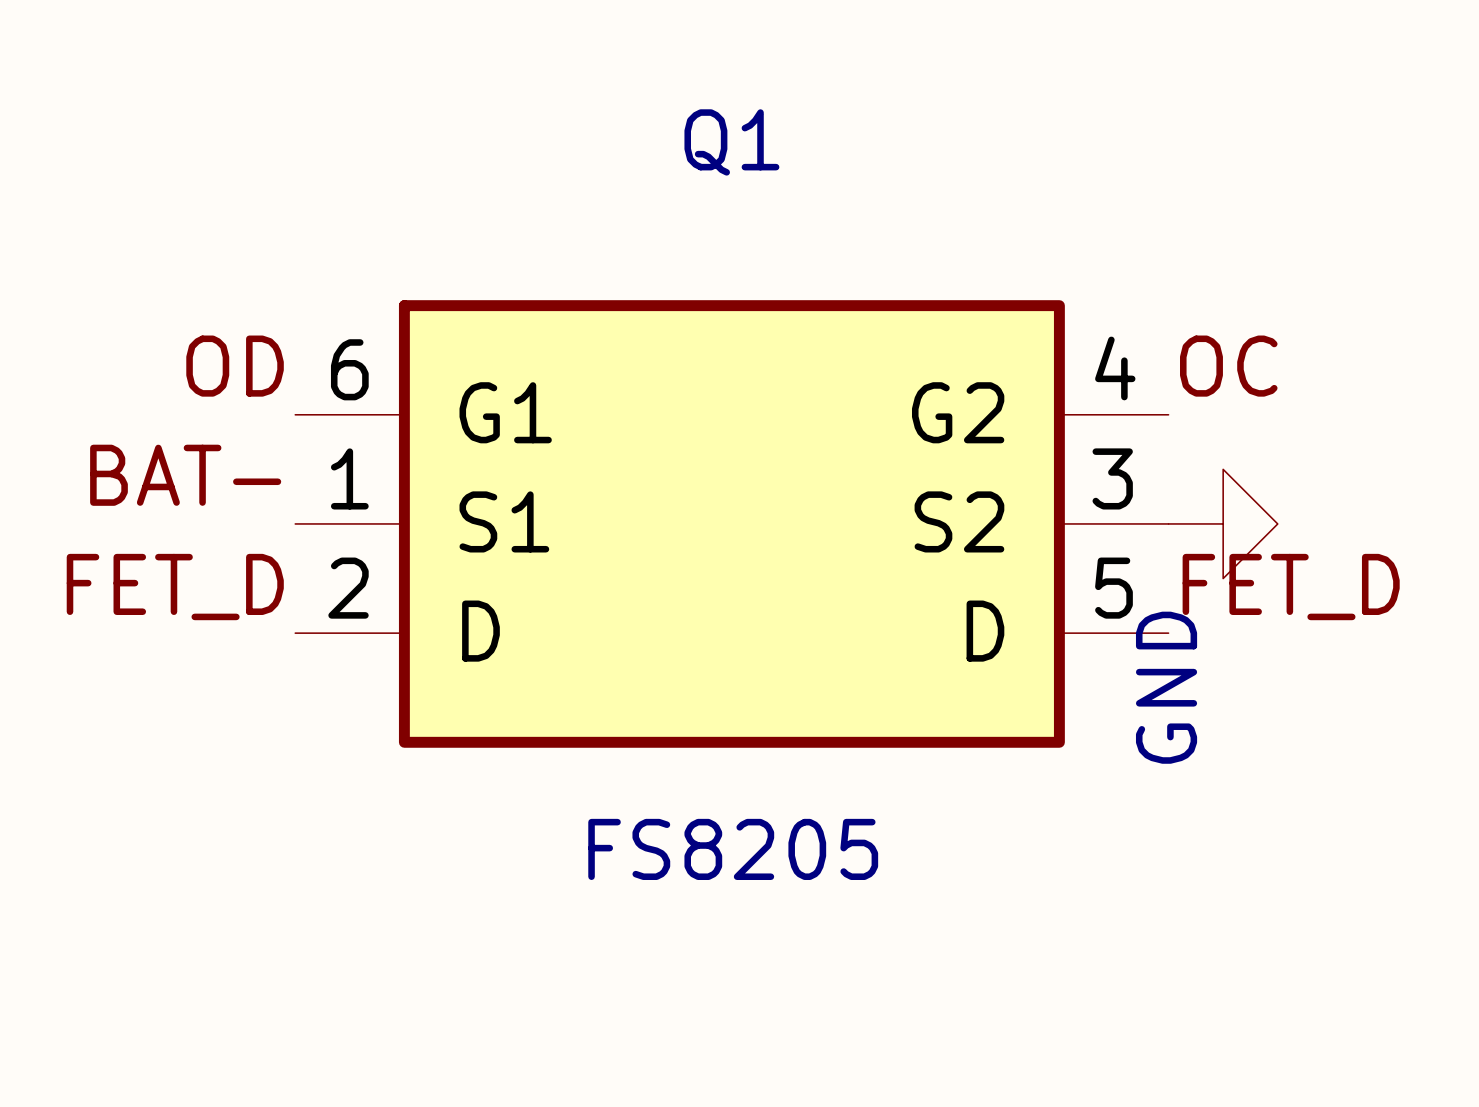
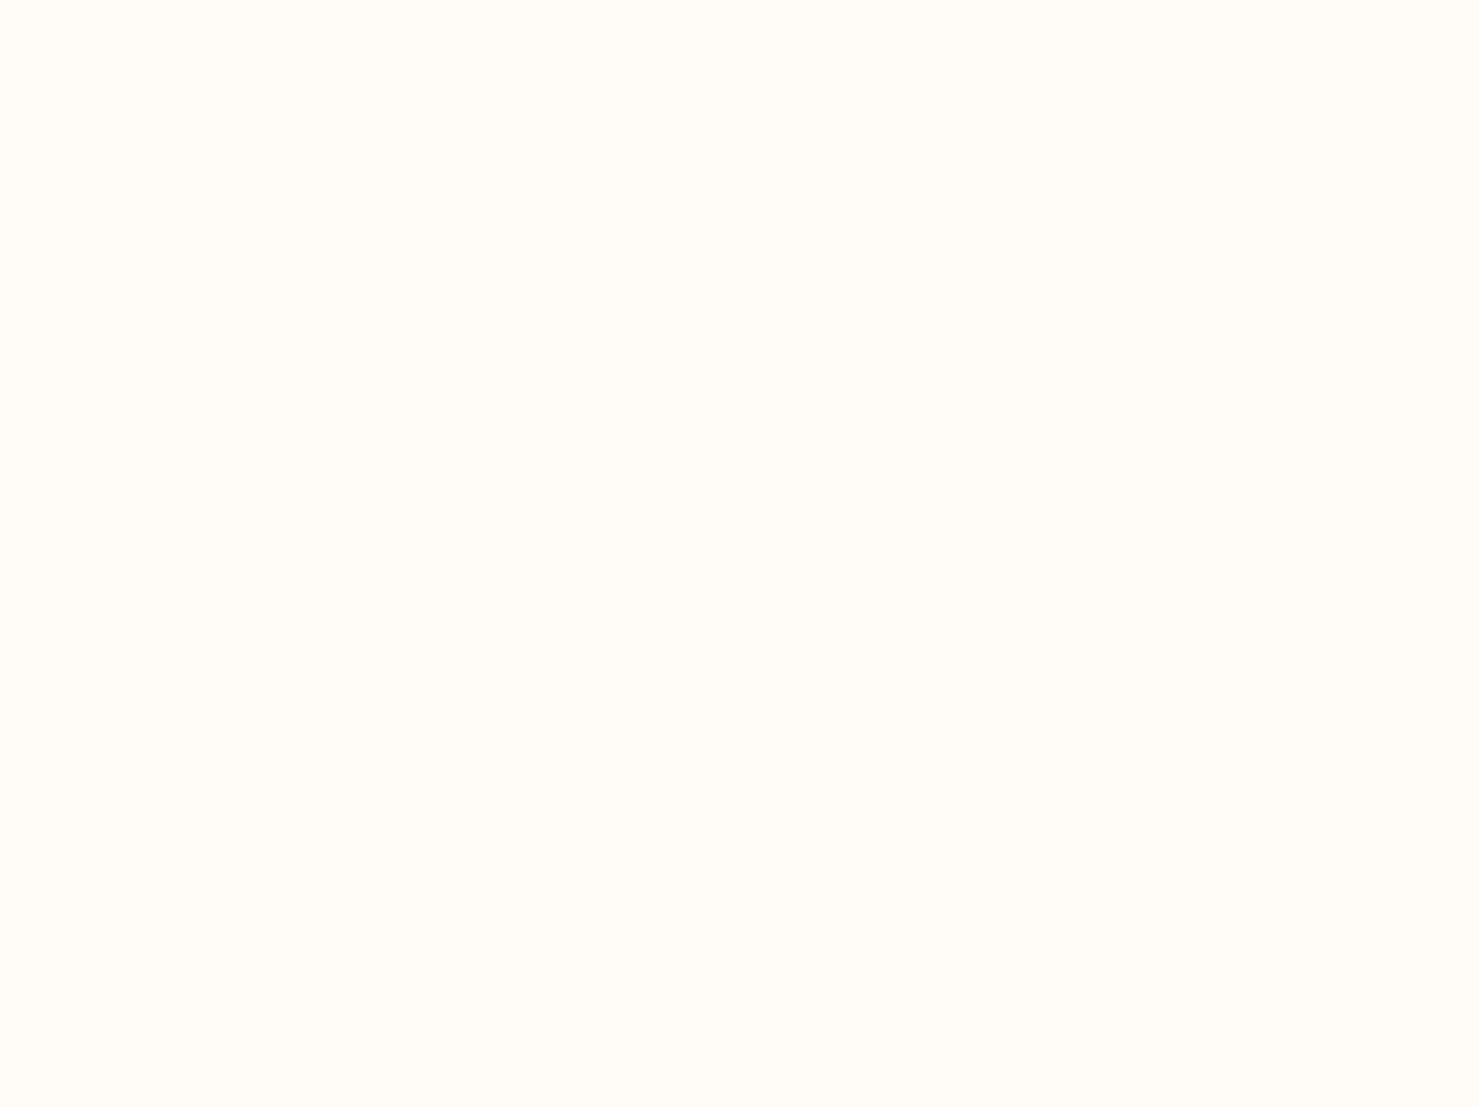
label: OD (235, 366) -> none
label: OC (1228, 366) -> none
label: BAT- (185, 475) -> none
Q1: FS8205 (731, 523) -> none
power symbol: GND (1223, 523) -> none
label: FET_D (175, 587) -> none
label: FET_D (1291, 587) -> none

